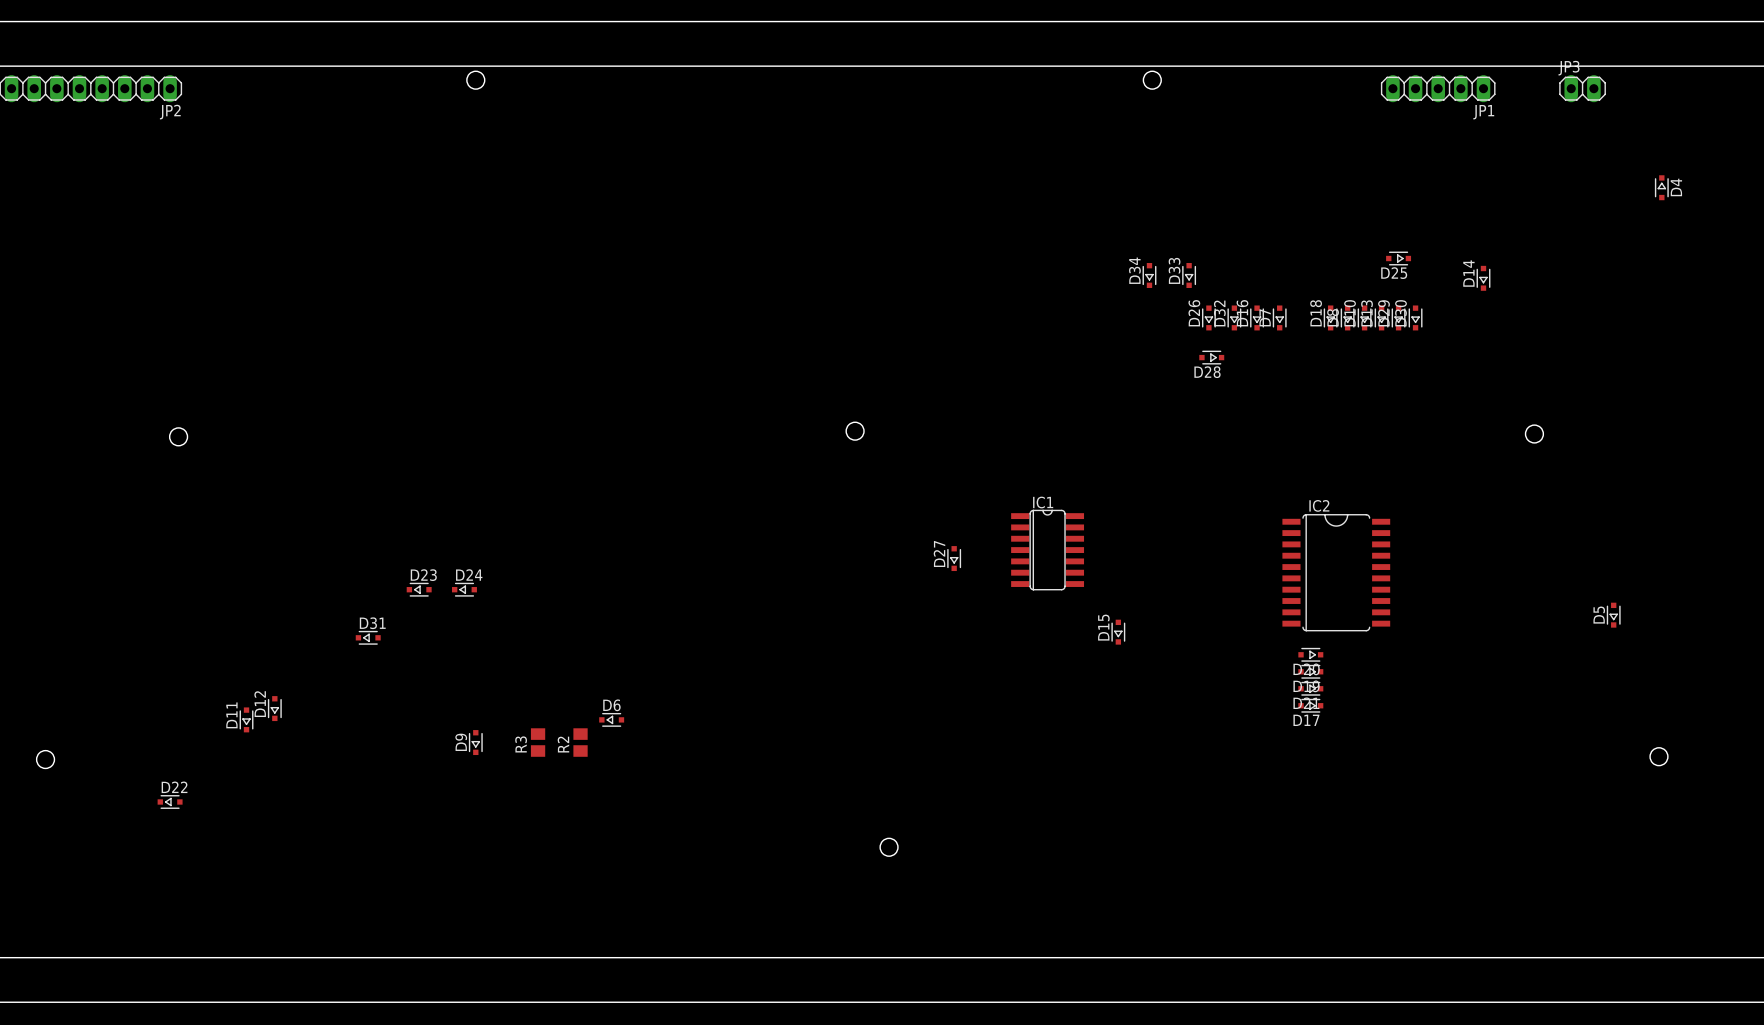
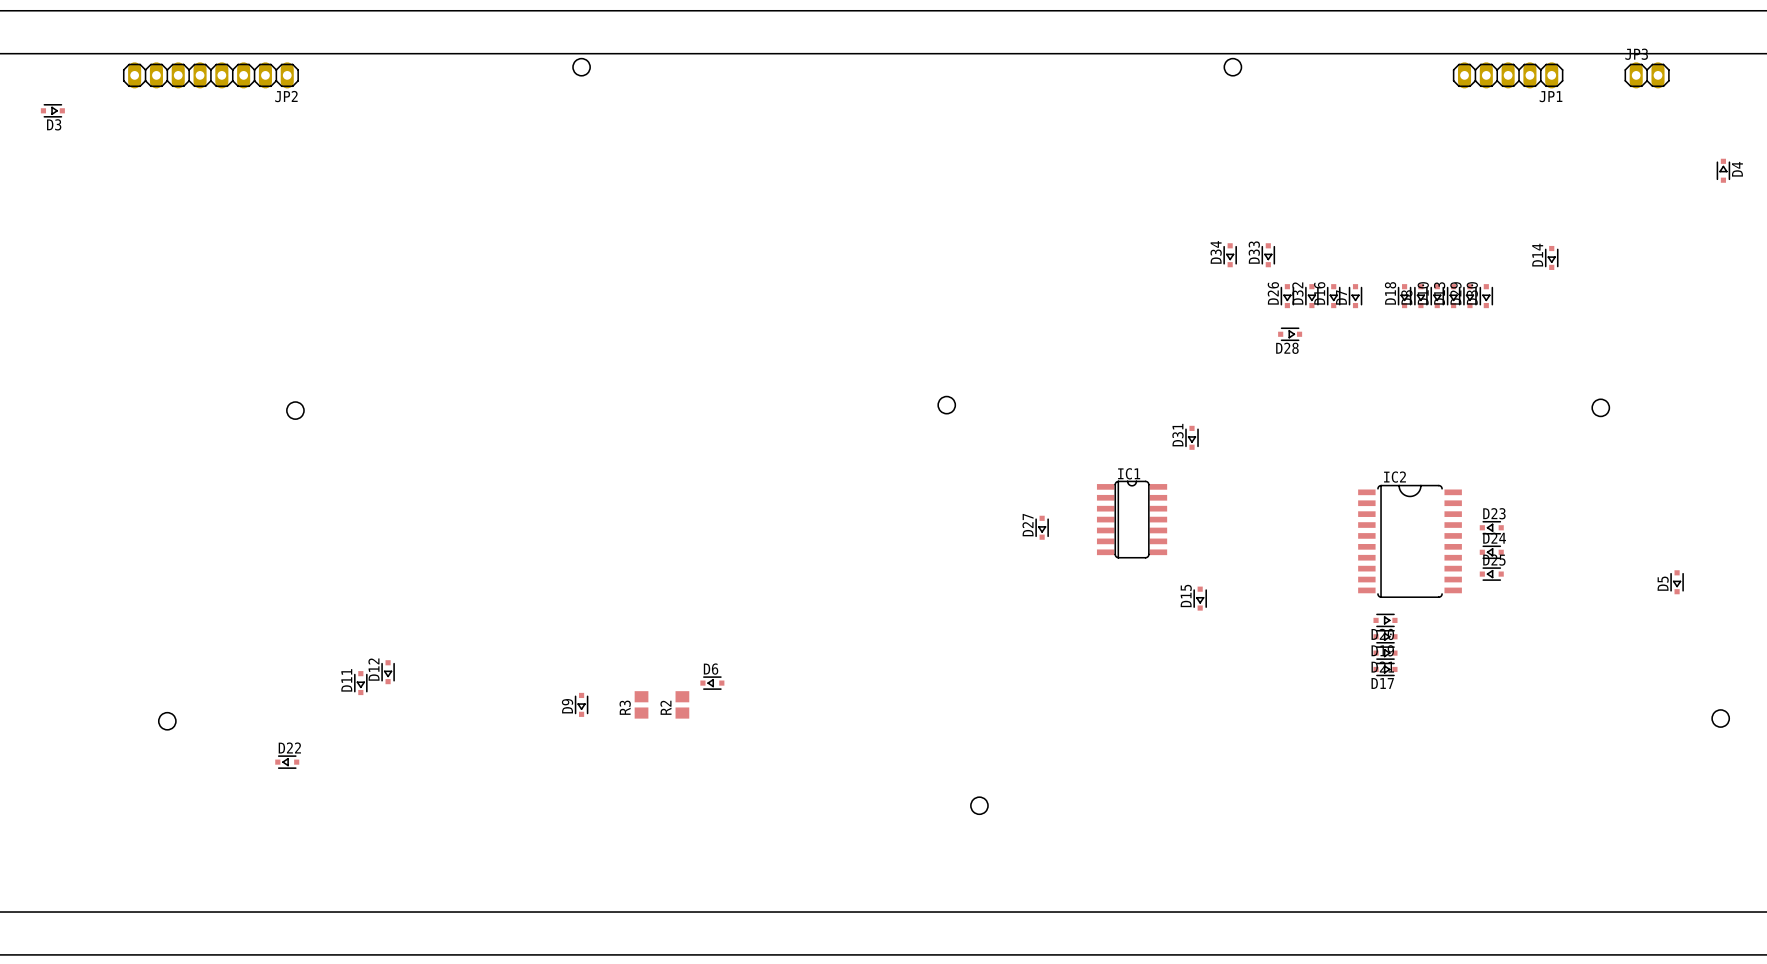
D25 rotation: 0° (1398, 258) -> 180° (1491, 574)
D25 position: (1398, 258) -> (1491, 574)
D23 position: (419, 589) -> (1491, 527)
D24 position: (464, 589) -> (1491, 552)
D31 rotation: 0° (368, 637) -> 90° counterclockwise (1192, 437)
D31 position: (368, 637) -> (1192, 437)

